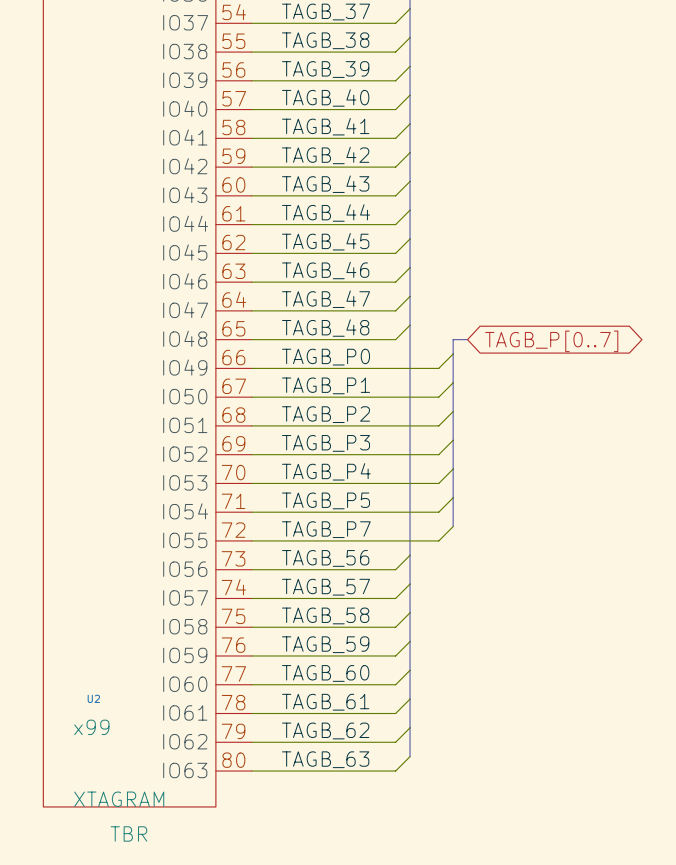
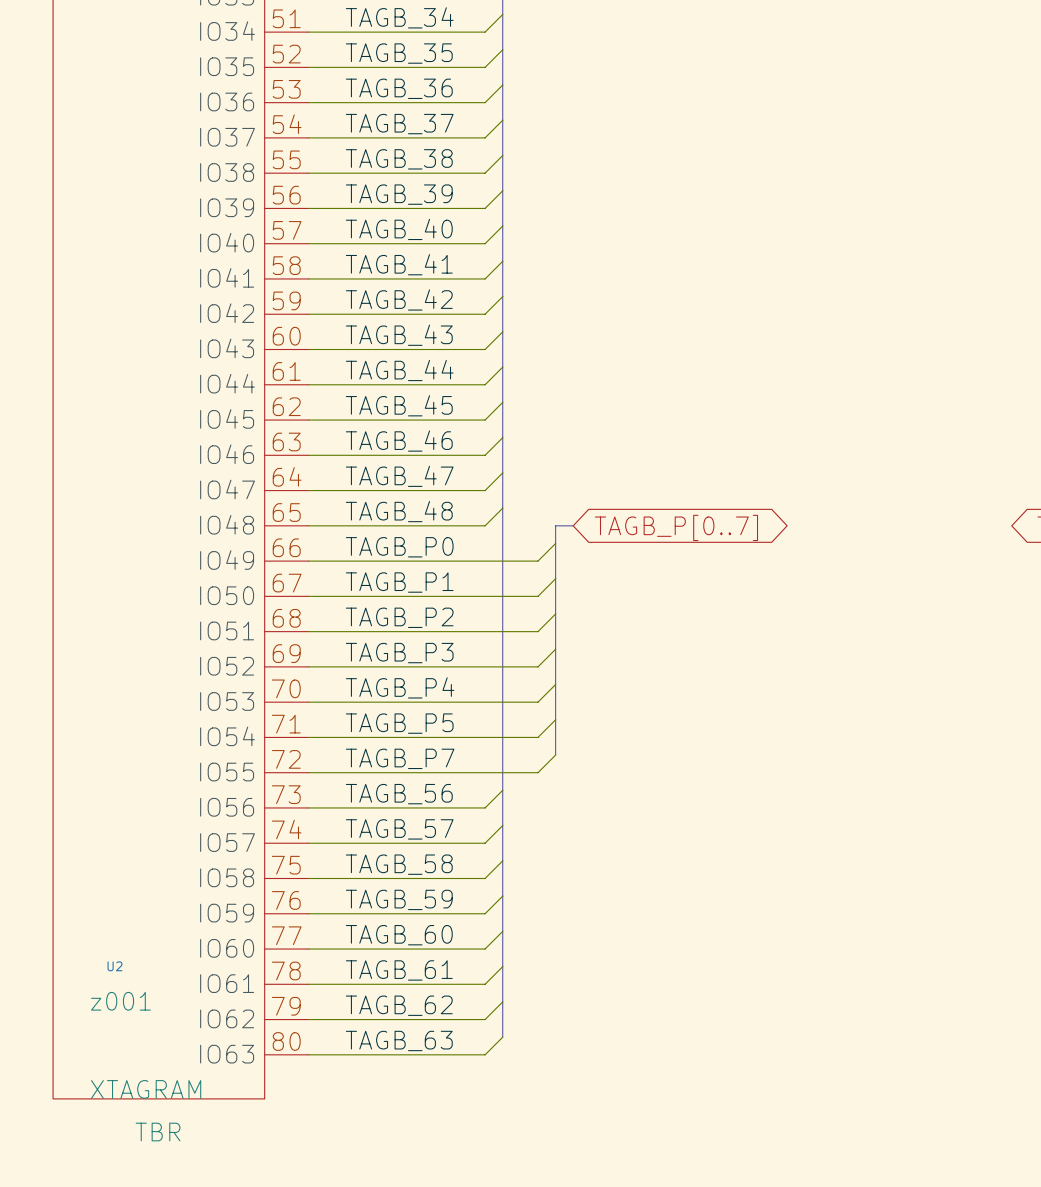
U2 text: x99 (91, 727) -> z001 (120, 1001)

